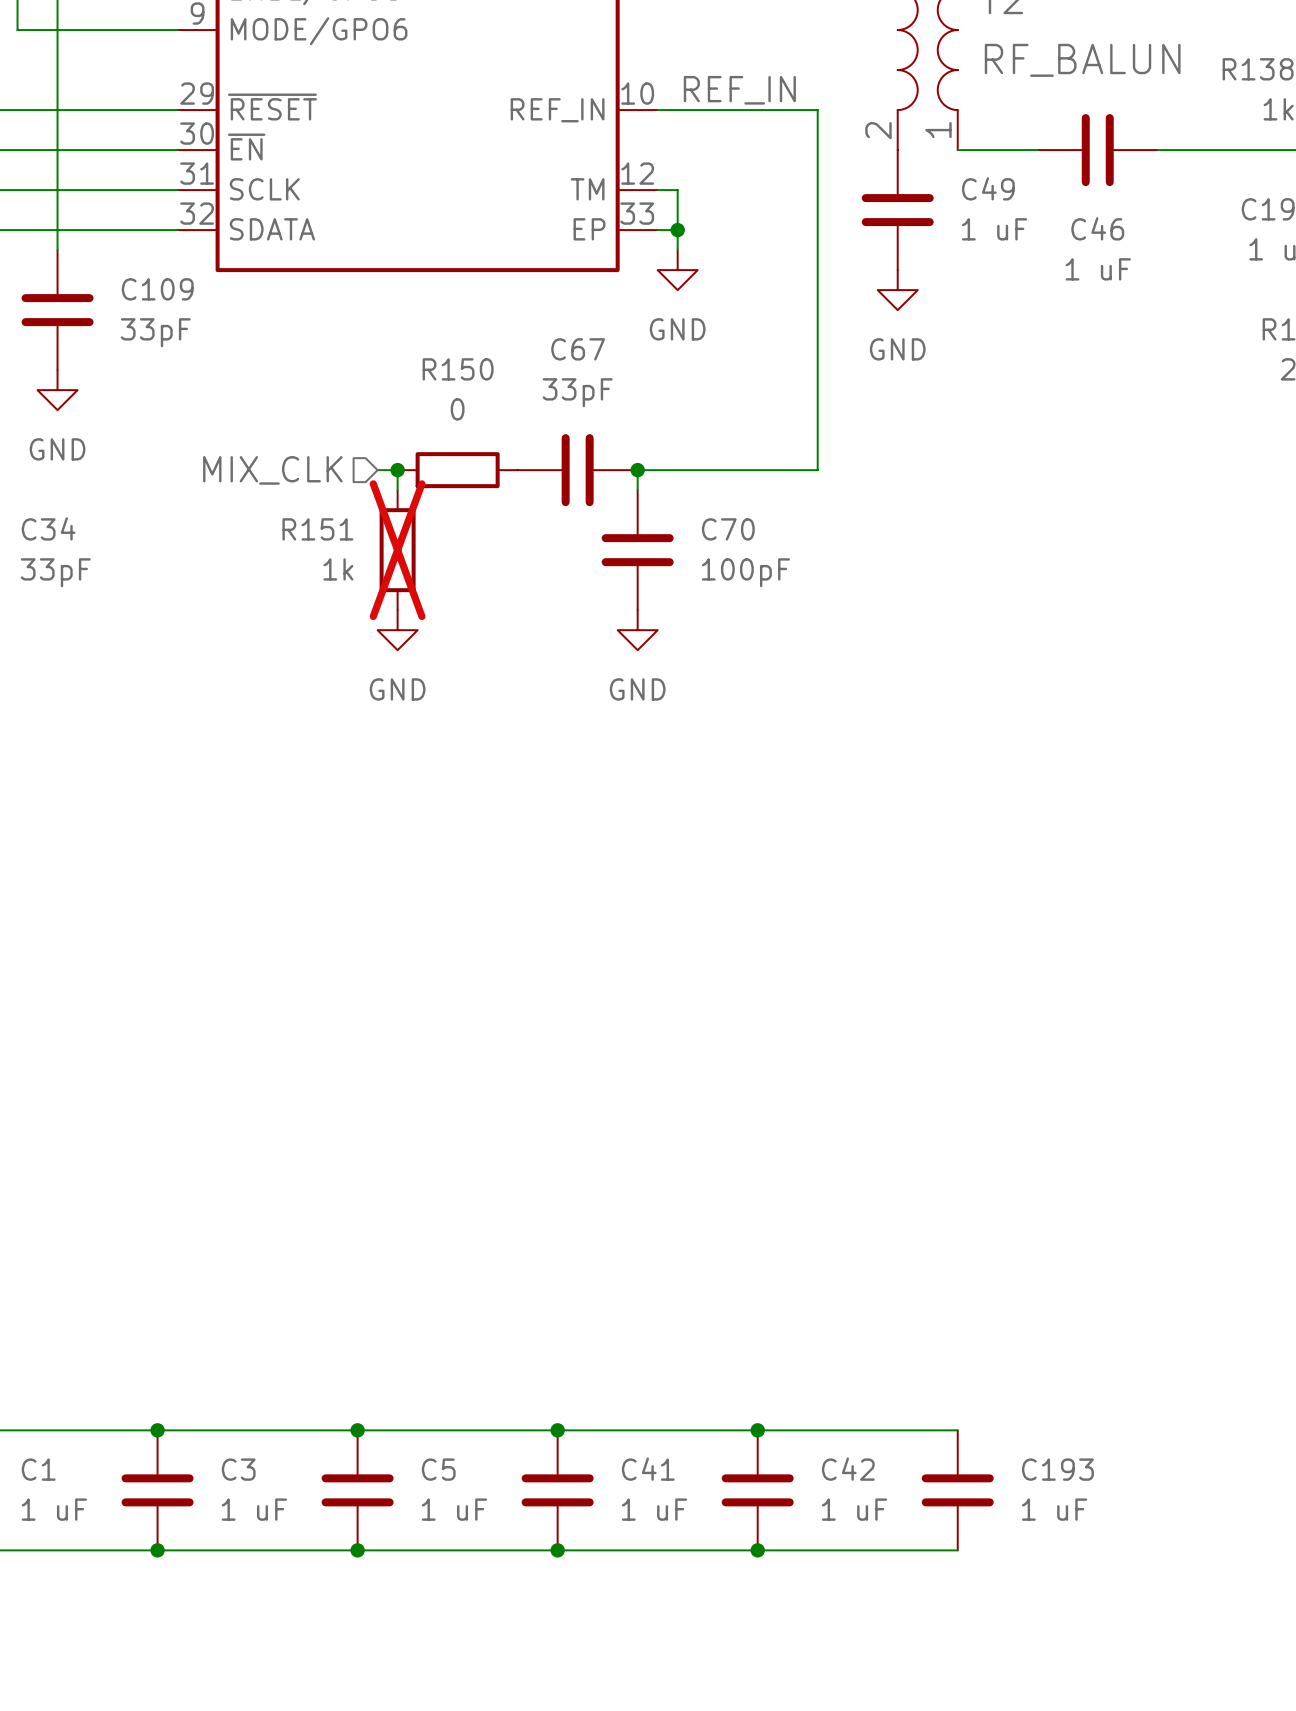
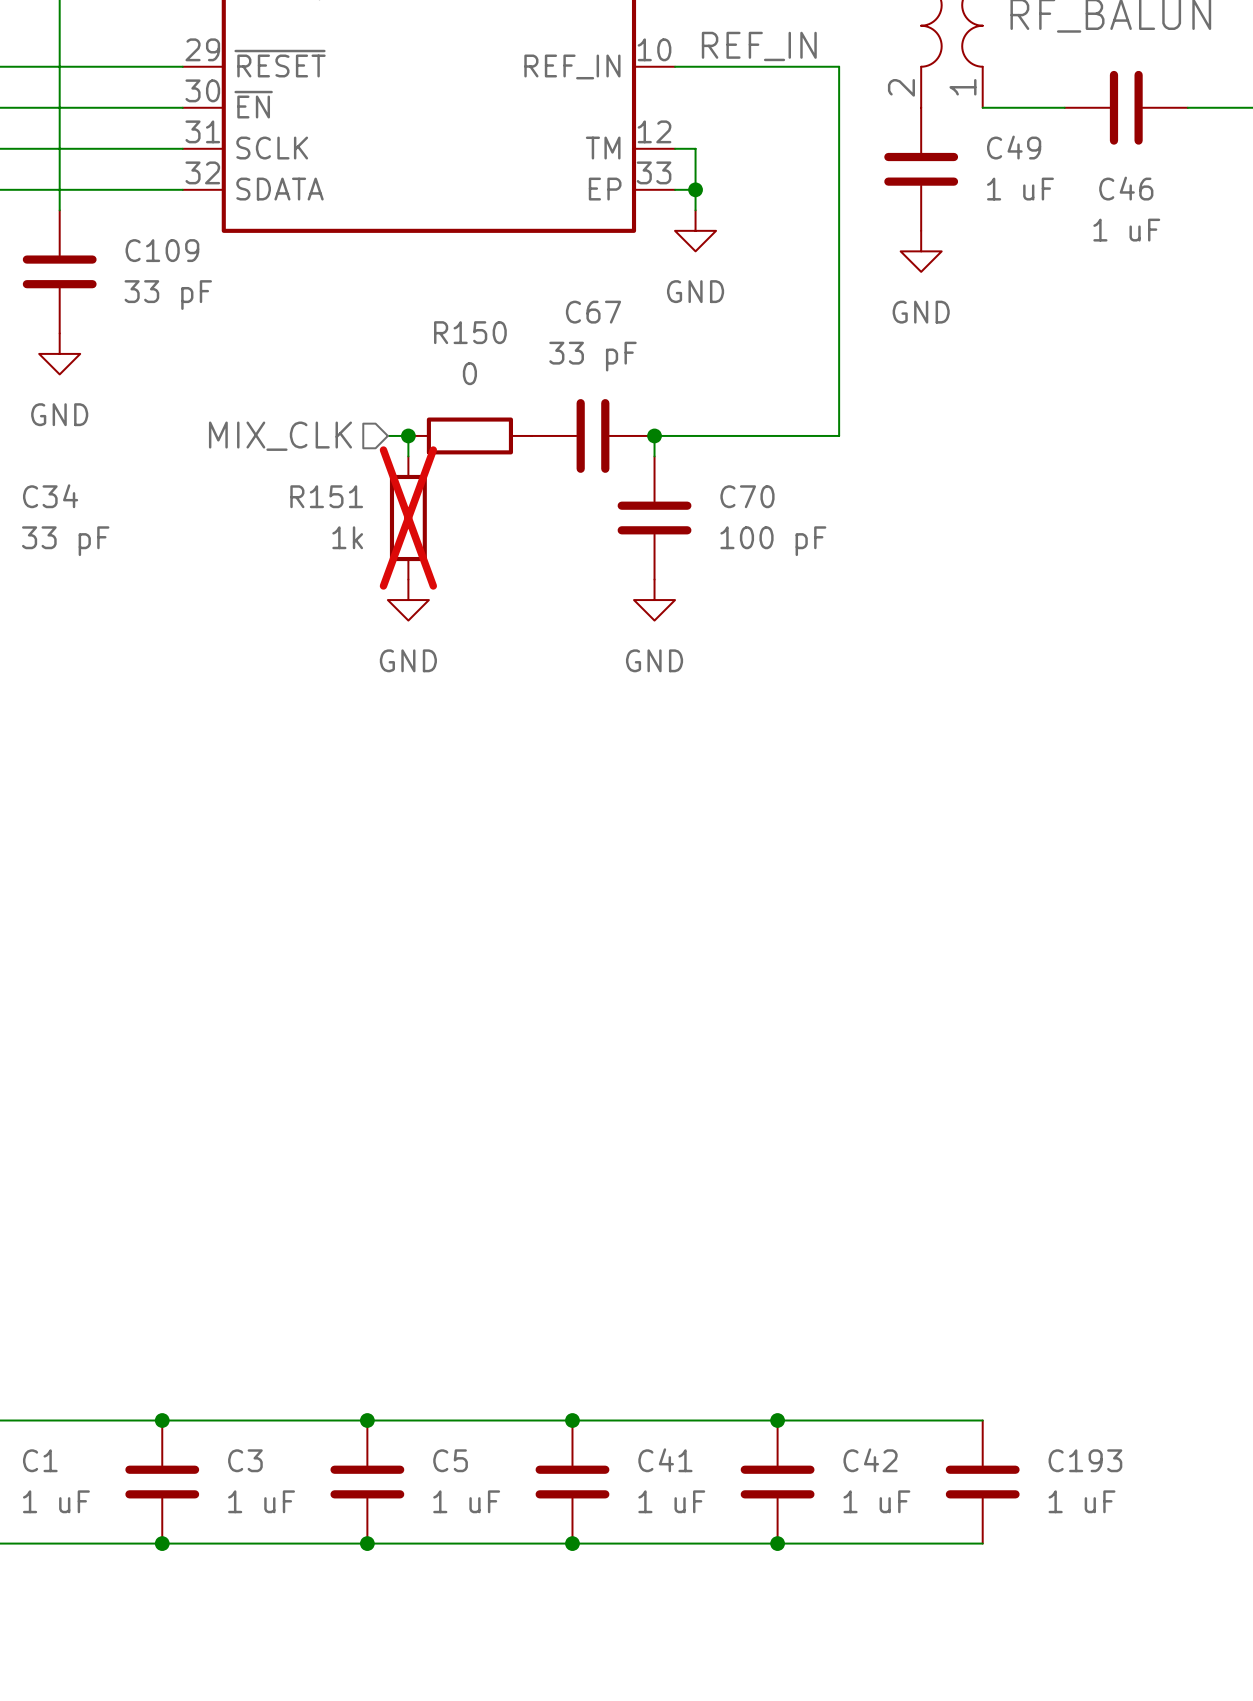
C109 value: 33pF (155, 332) -> 33 pF (168, 295)
C67 value: 33pF (577, 392) -> 33 pF (592, 356)
C34 value: 33pF (55, 572) -> 33 pF (65, 541)
C70 value: 100pF (745, 572) -> 100 pF (773, 541)

